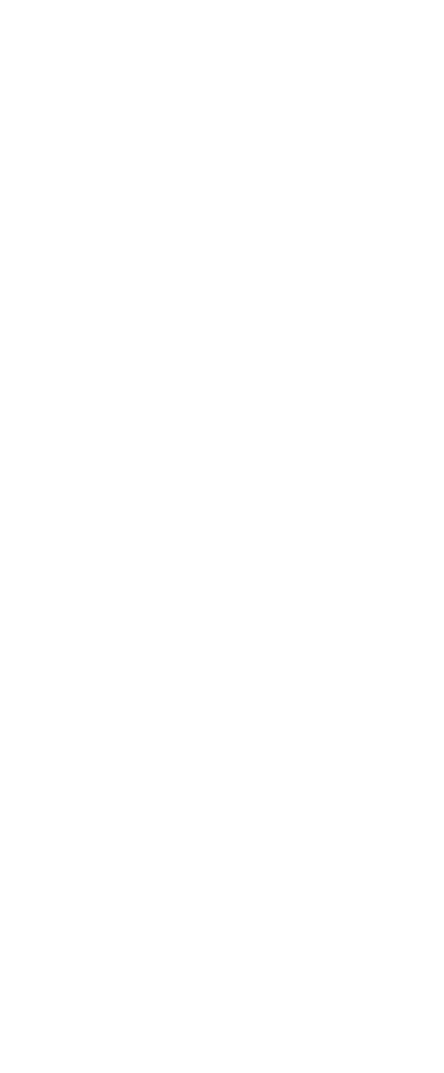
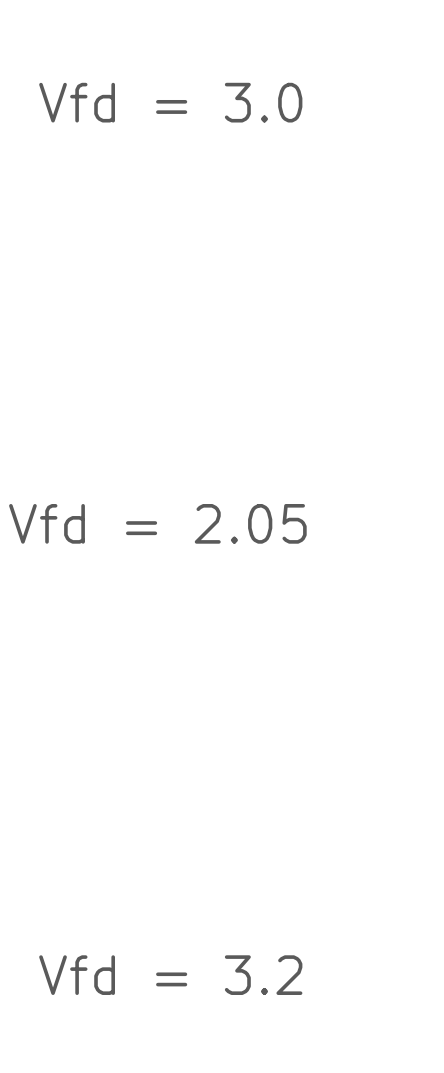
text: none -> Vfd = 3.0 (170, 102)
text: none -> Vfd = 2.05 (157, 523)
text: none -> Vfd = 3.2 (170, 975)

